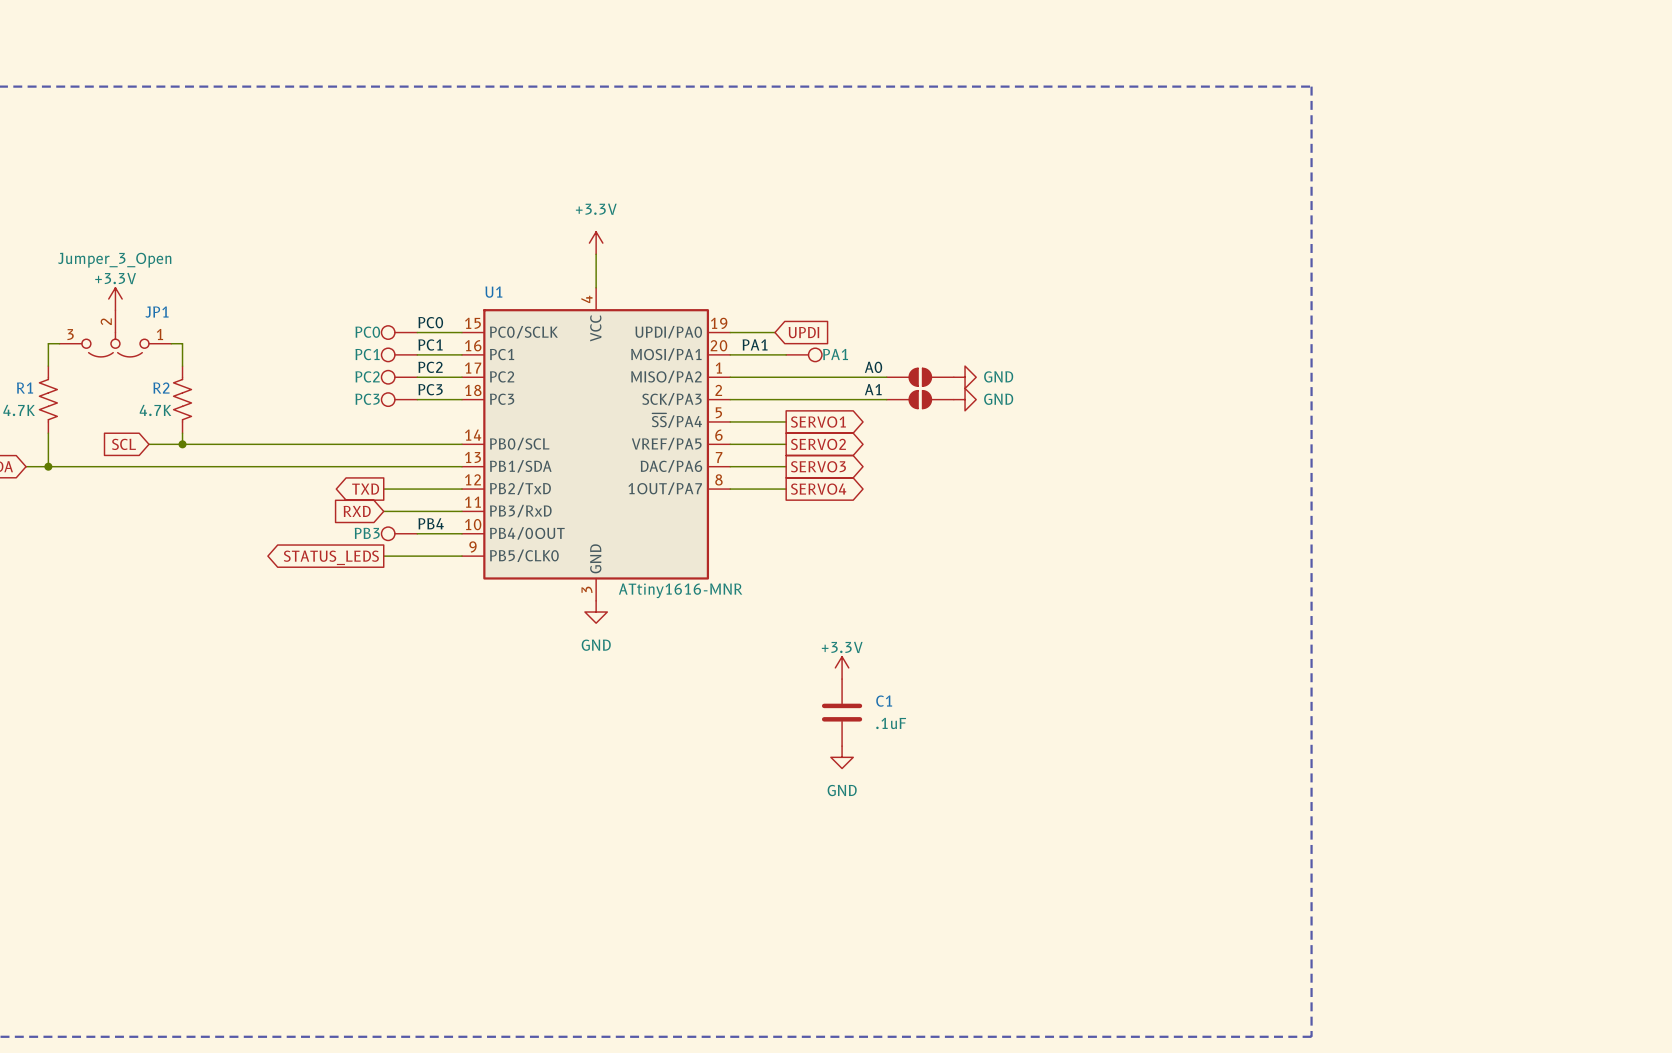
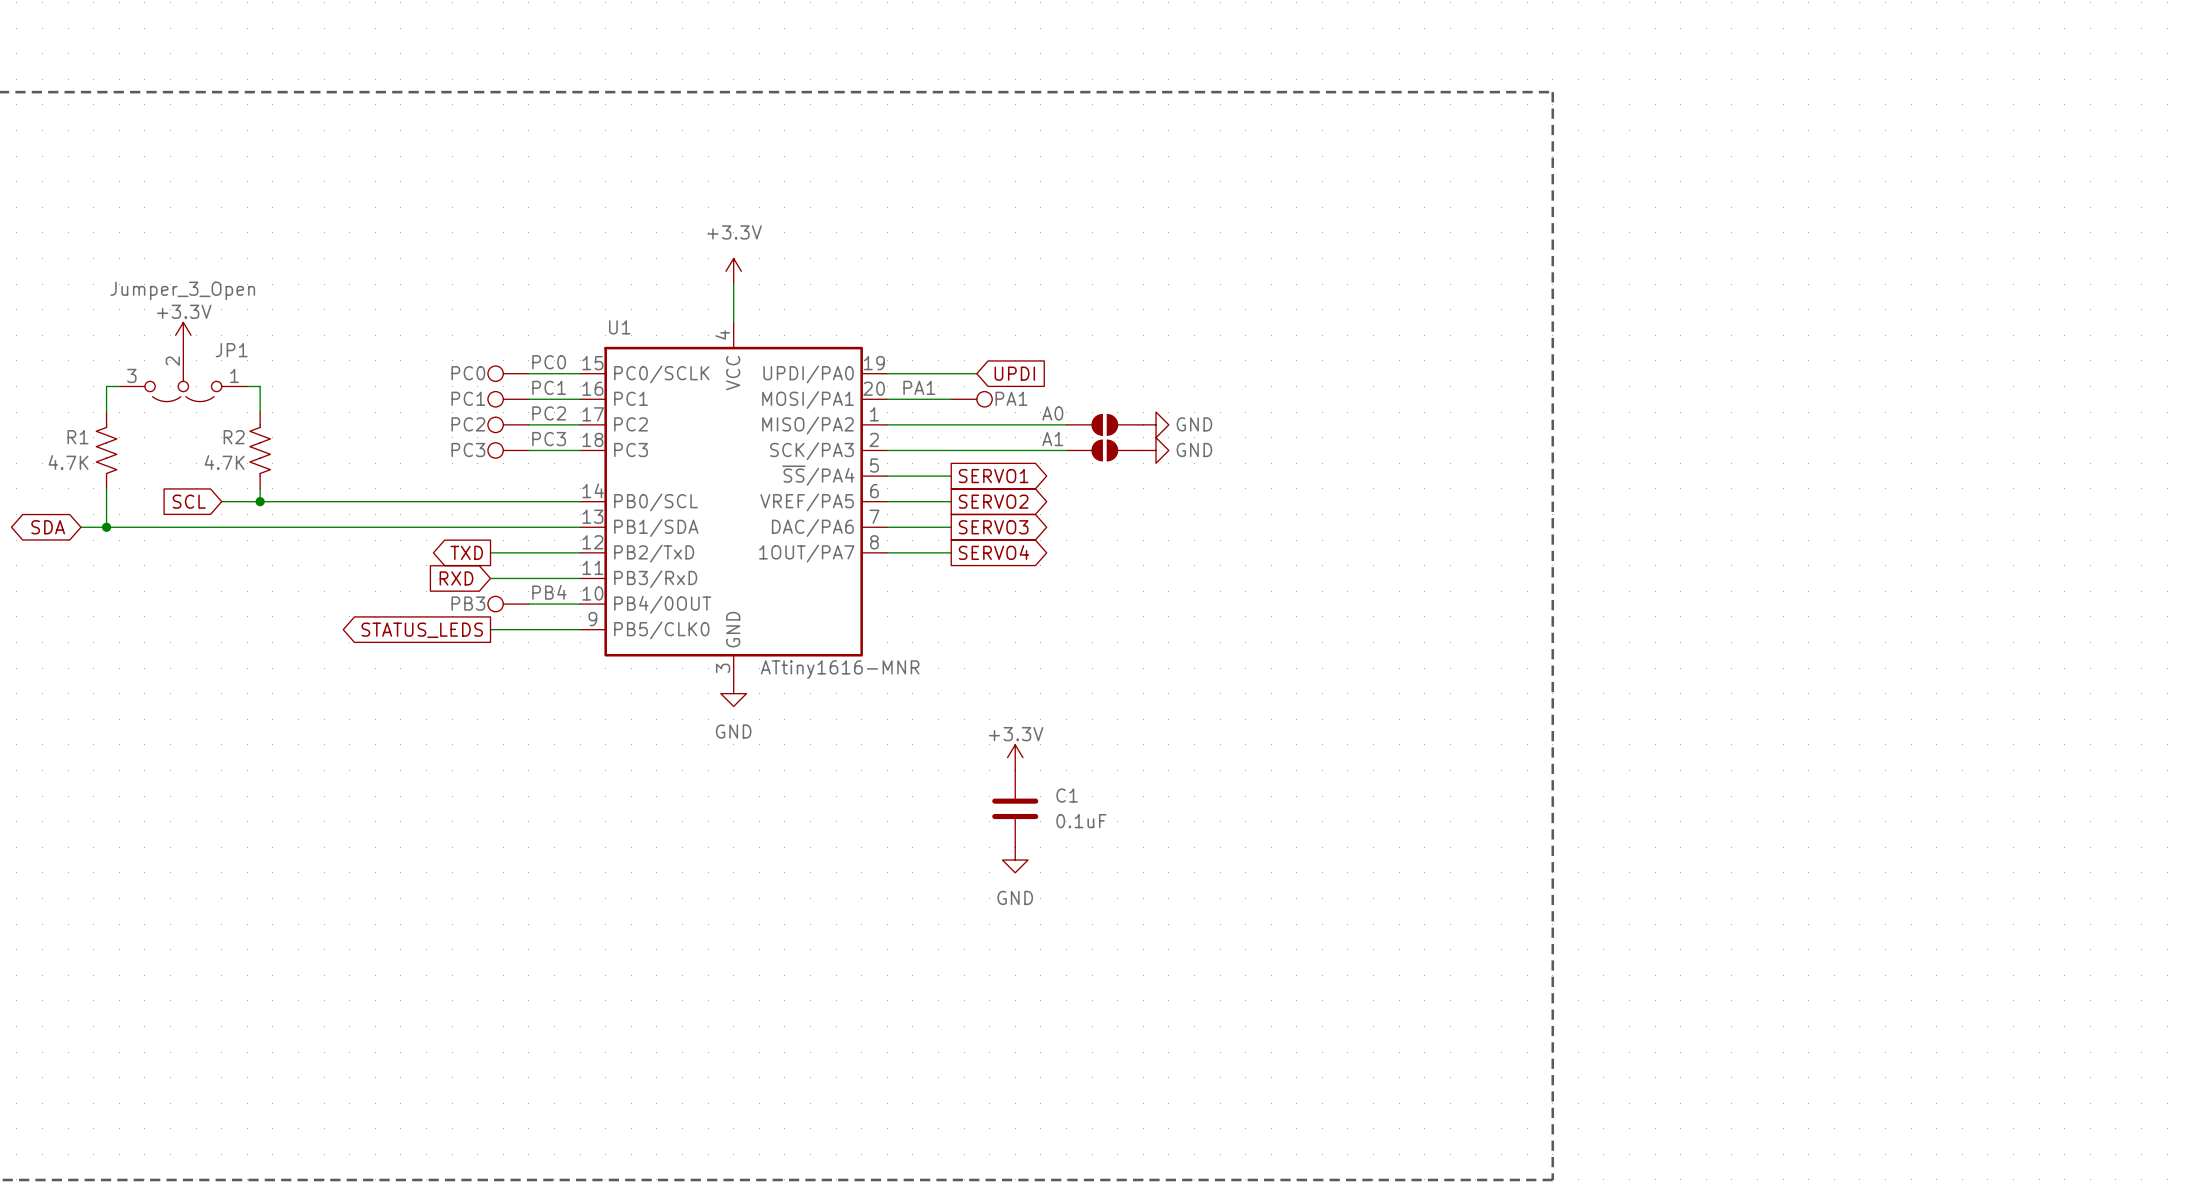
wire: none -> (938, 373) (976, 373)
global label position: UPDI (803, 332) -> UPDI (1014, 373)
C1 value: .1uF (891, 723) -> 0.1uF (1081, 821)

